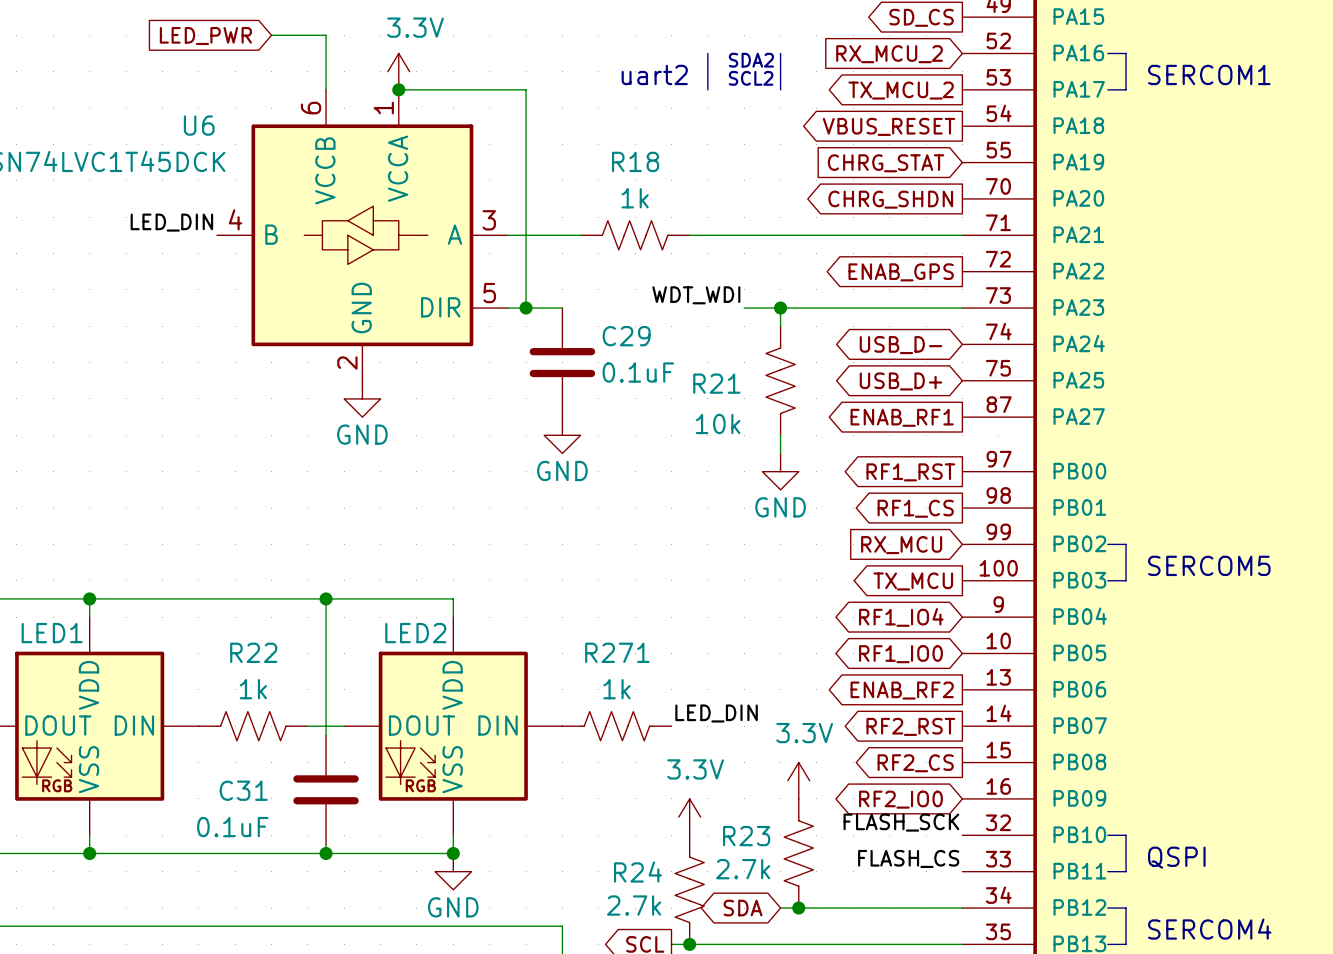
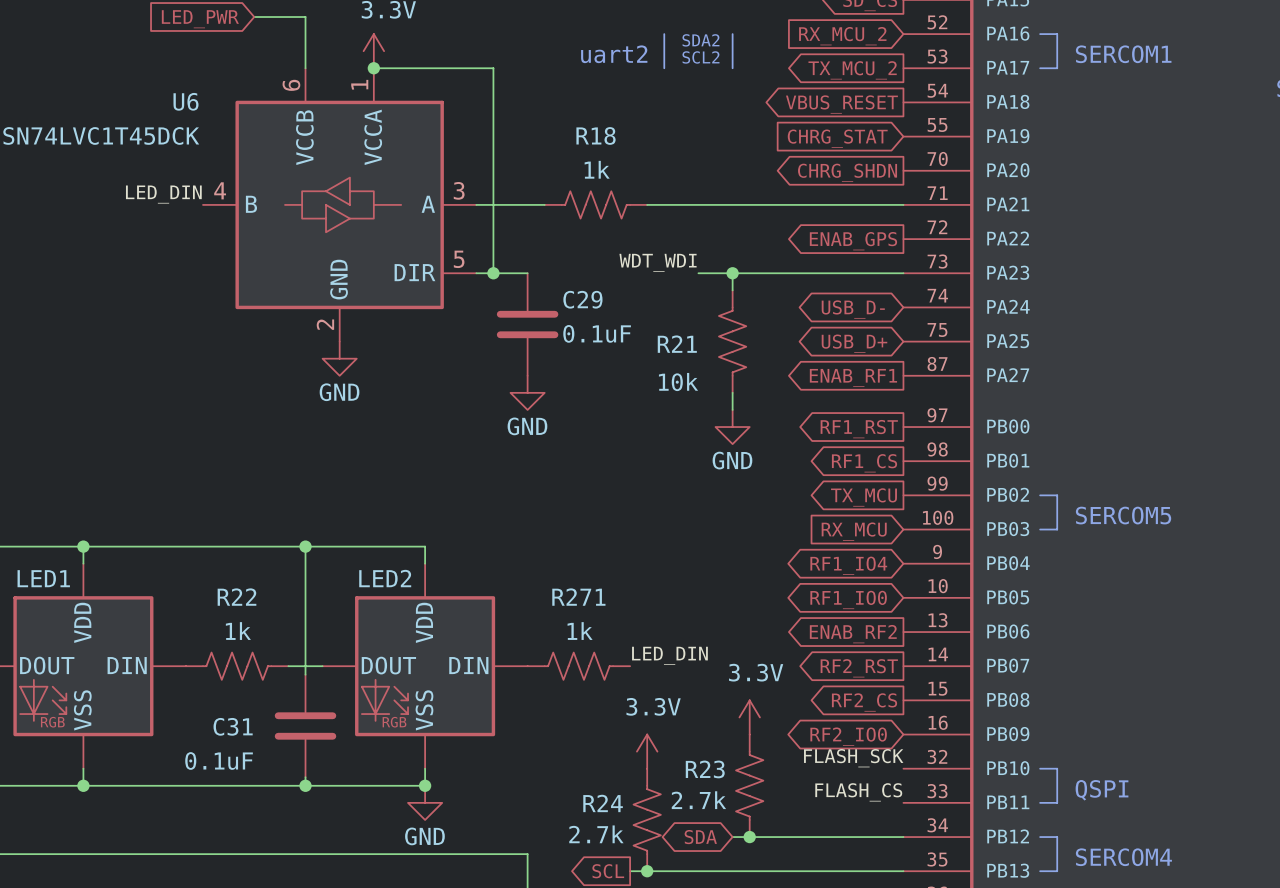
global label shape: input (901, 545) -> output (864, 497)
global label: RX_MCU (901, 545) -> TX_MCU (864, 497)
global label shape: output (913, 581) -> input (854, 531)
global label: TX_MCU (913, 581) -> RX_MCU (854, 531)

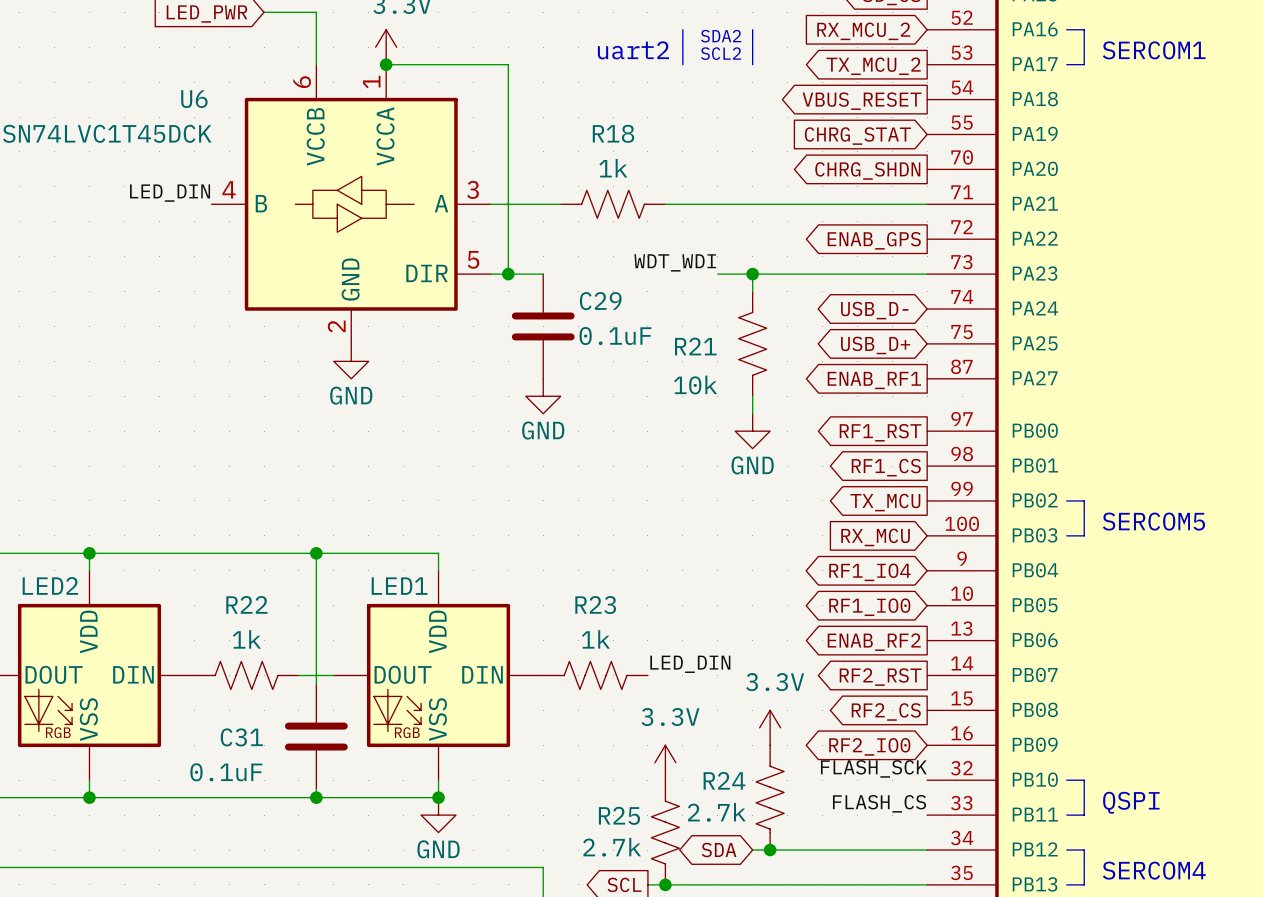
LED1 name: LED1 (43, 578) -> LED2 (50, 585)
LED2 name: LED2 (385, 578) -> LED1 (399, 586)
R271 name: R271 (578, 597) -> R23 (595, 605)
R23 name: R23 (705, 769) -> R24 (724, 780)
R24 name: R24 (603, 803) -> R25 (619, 815)

